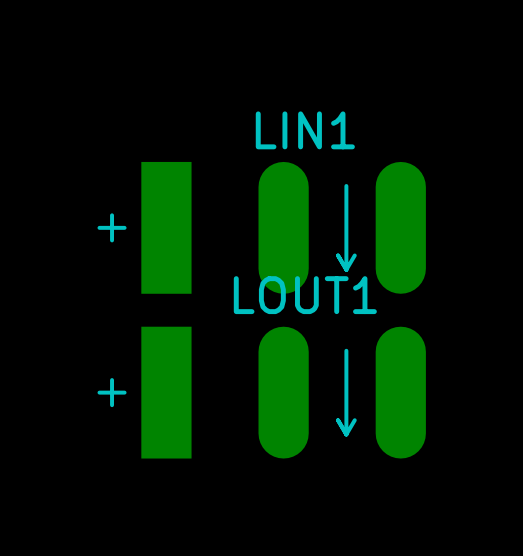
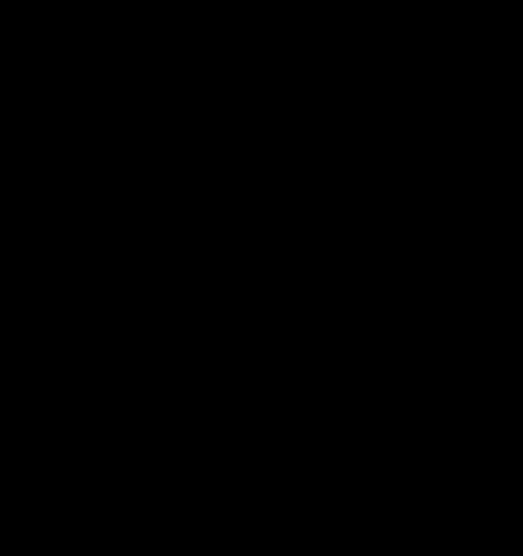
LIN1: (261, 227) -> none
LOUT1: (261, 392) -> none

